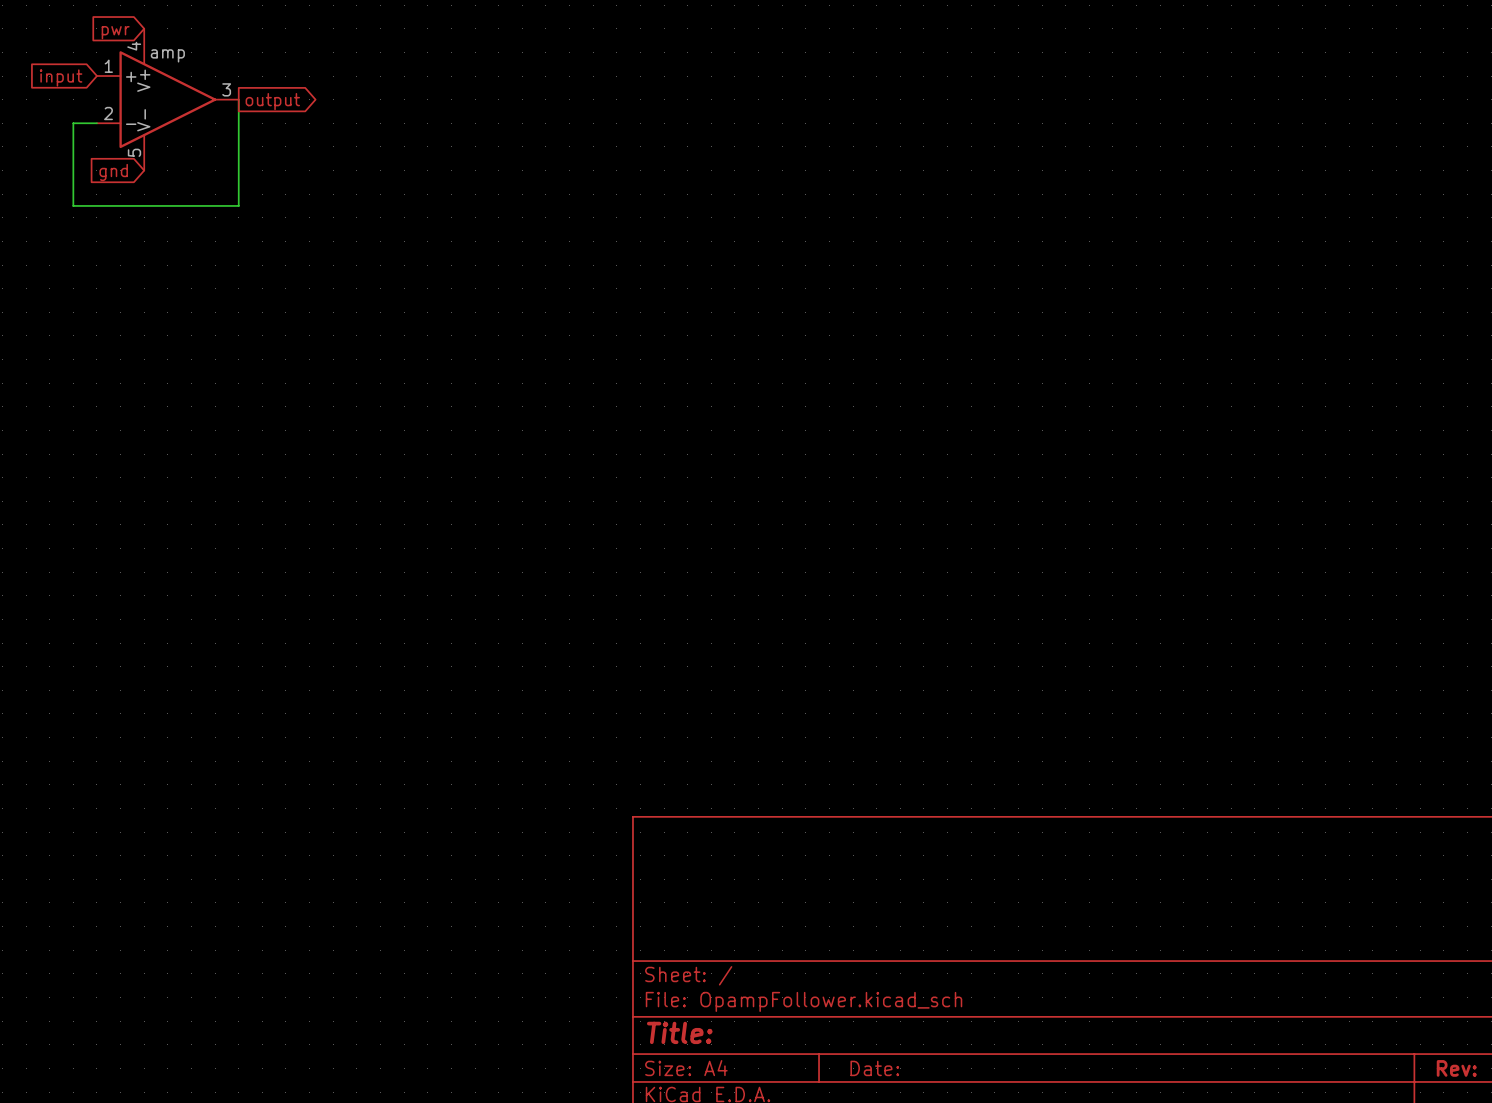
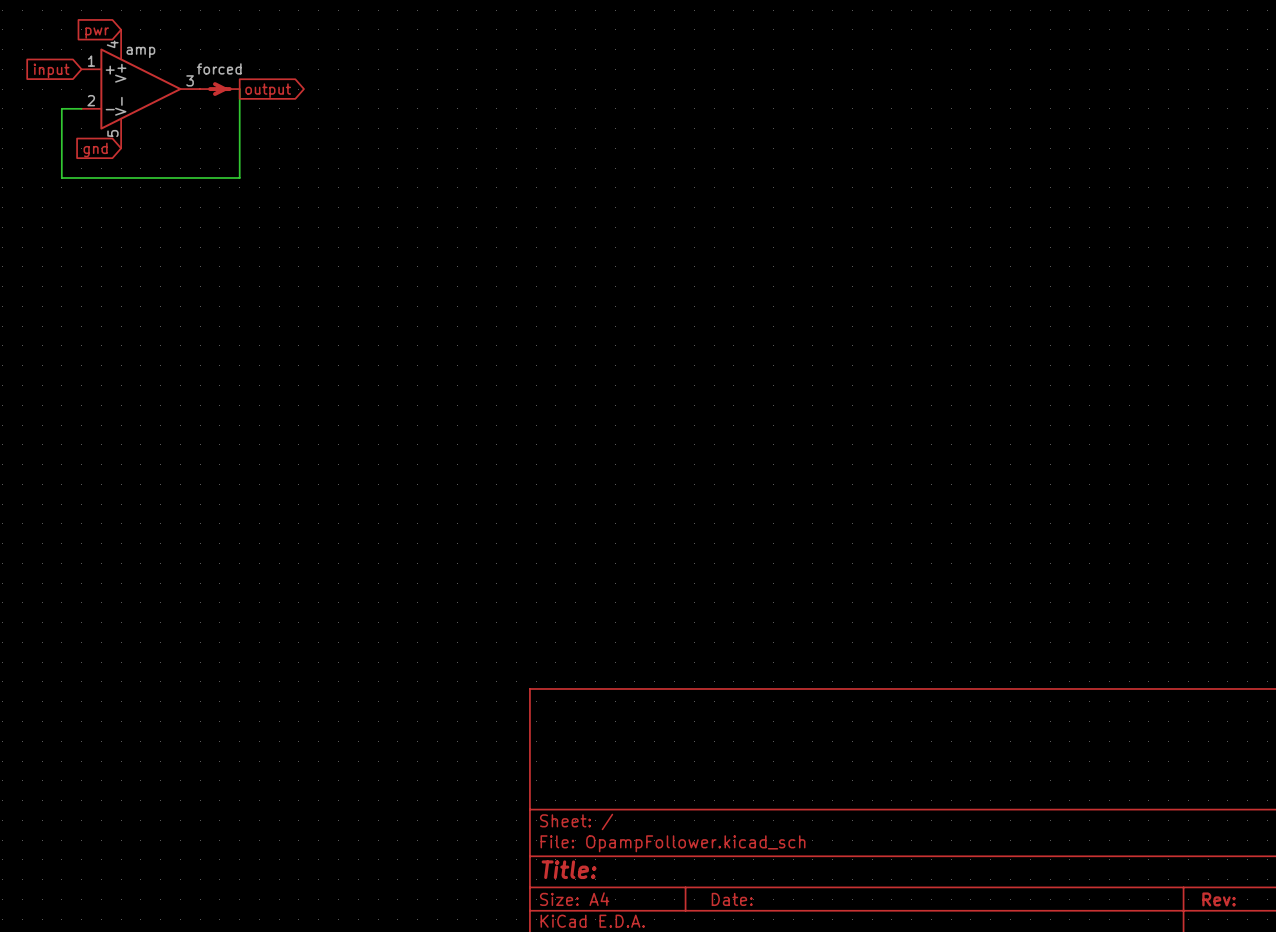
wire: (238, 99) (238, 205) -> (239, 89) (239, 177) (200, 177)
forced: none -> (219, 89)
global label position: output (272, 101) -> output (268, 90)

